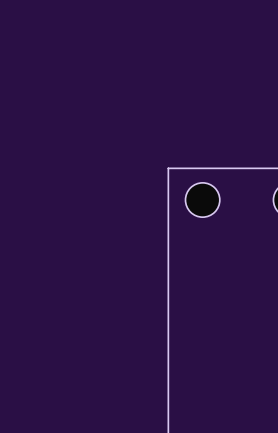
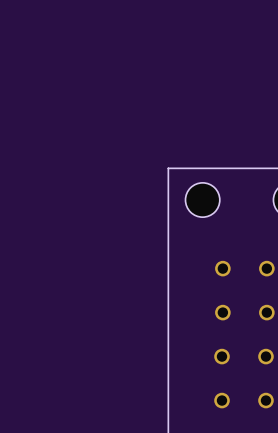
via: none -> (222, 268)
via: none -> (266, 268)
via: none -> (222, 312)
via: none -> (266, 312)
via: none -> (222, 356)
via: none -> (265, 356)
via: none -> (222, 400)
via: none -> (265, 400)

